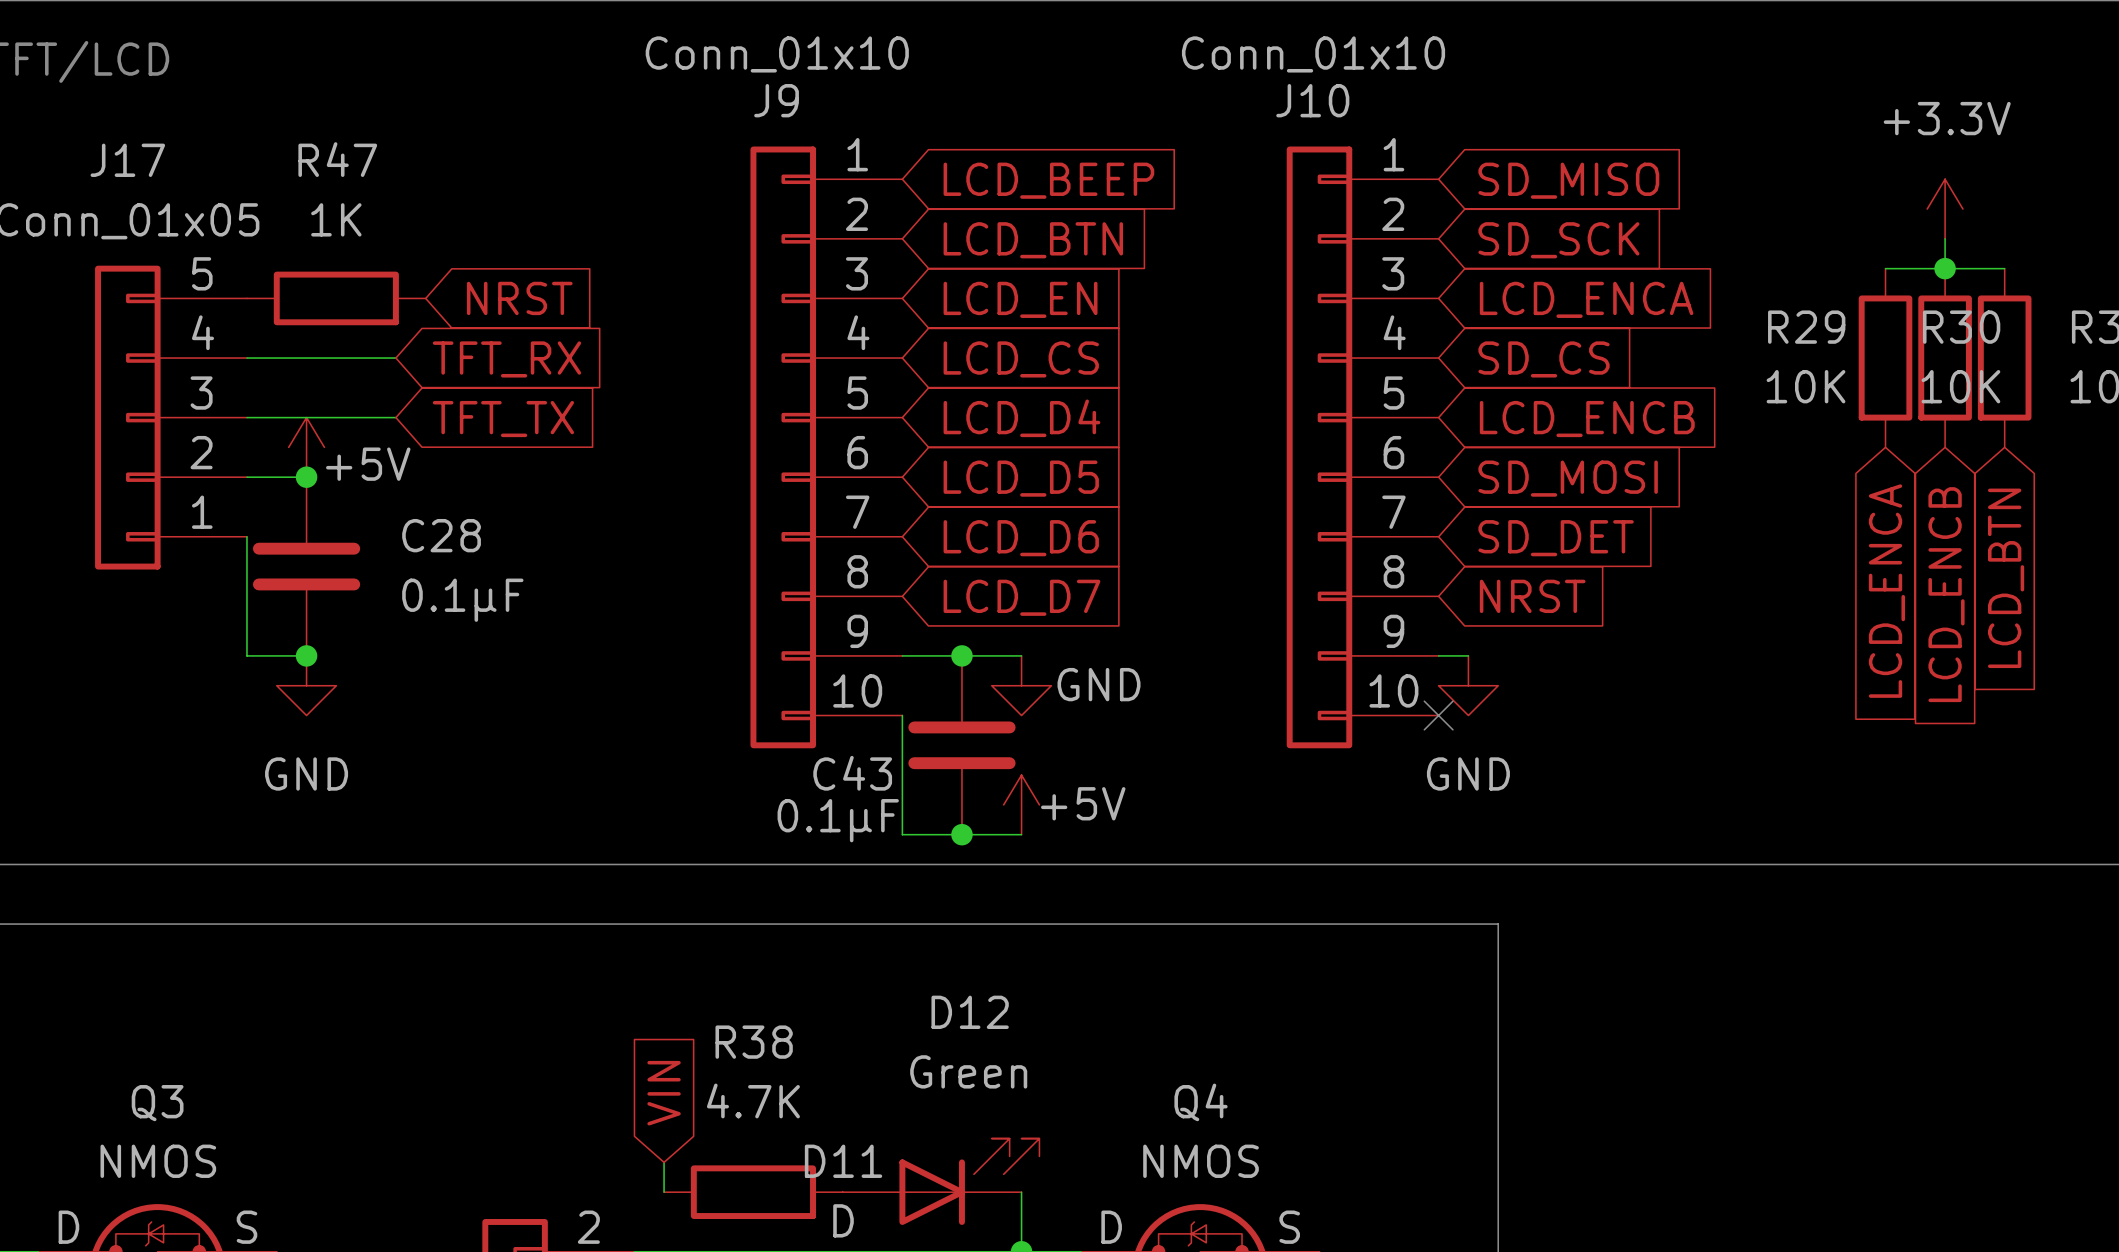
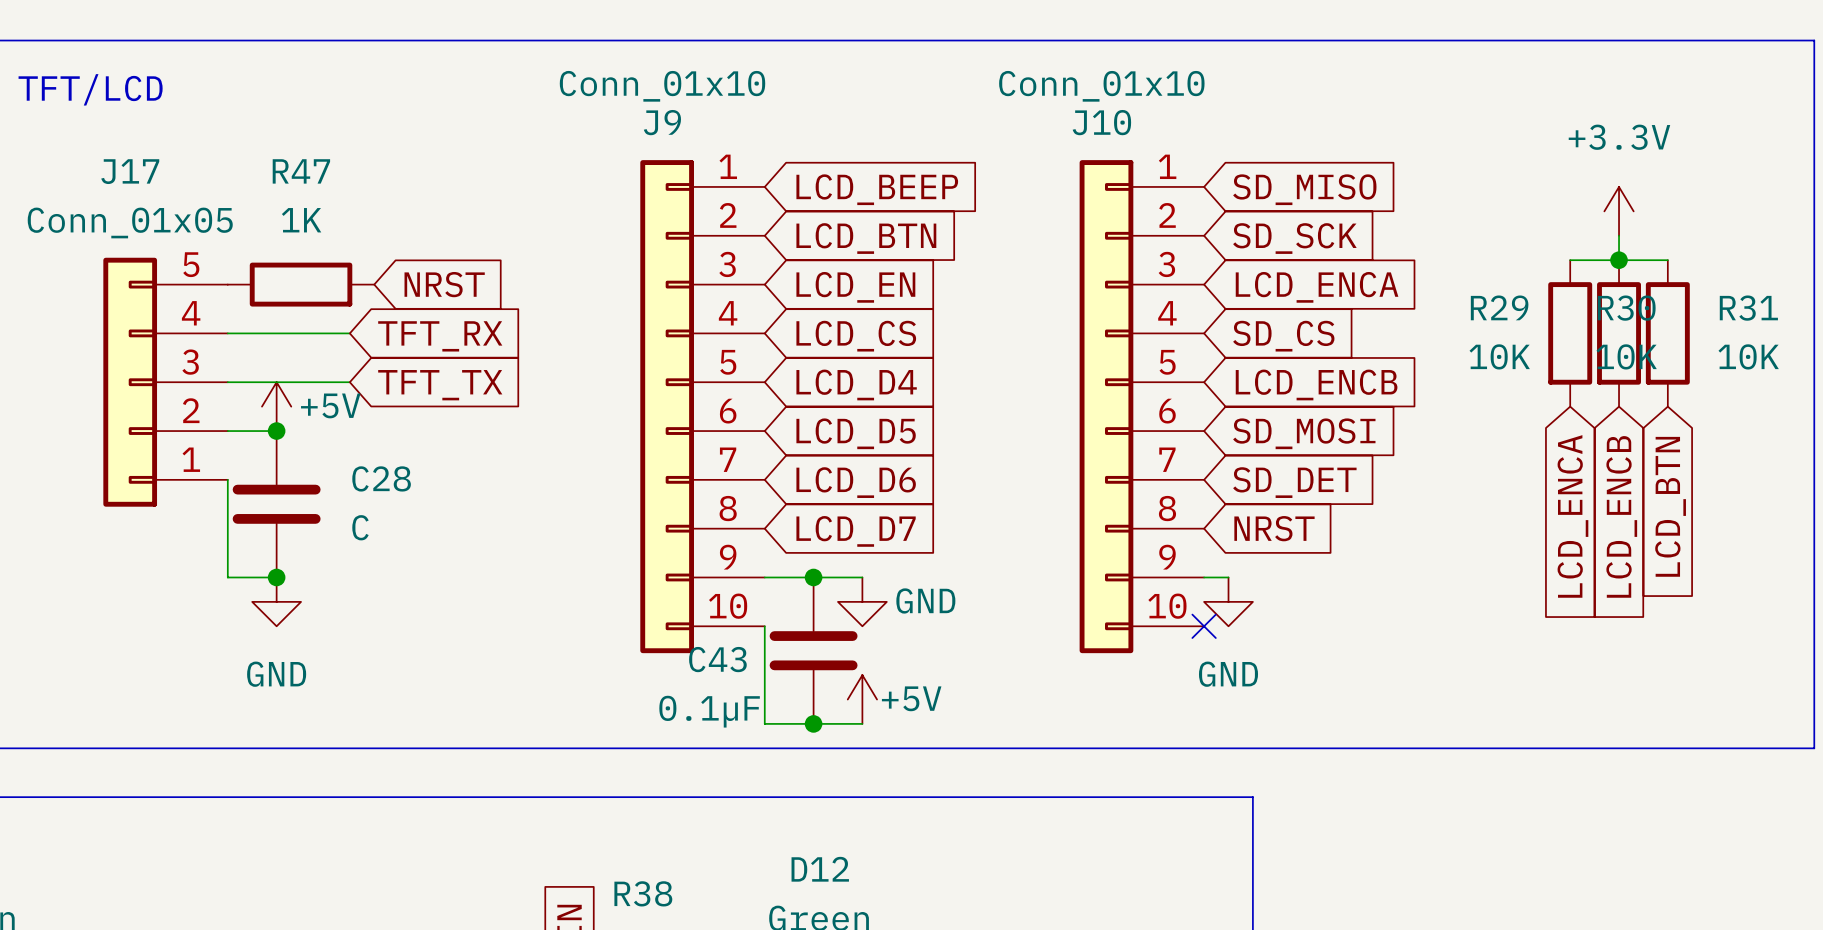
power symbol text position: +5V (368, 464) -> +5V (330, 405)
C28 value: 0.1µF (462, 600) -> C (360, 527)
C43 name position: C43 (852, 773) -> C43 (717, 659)

